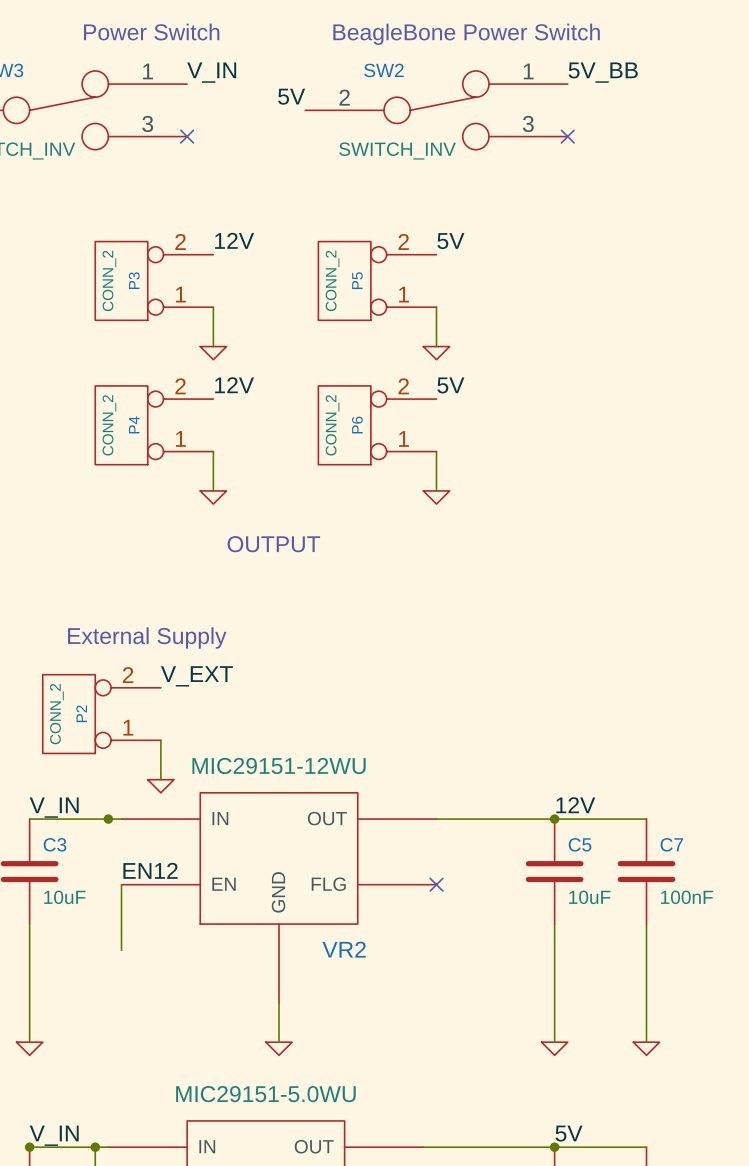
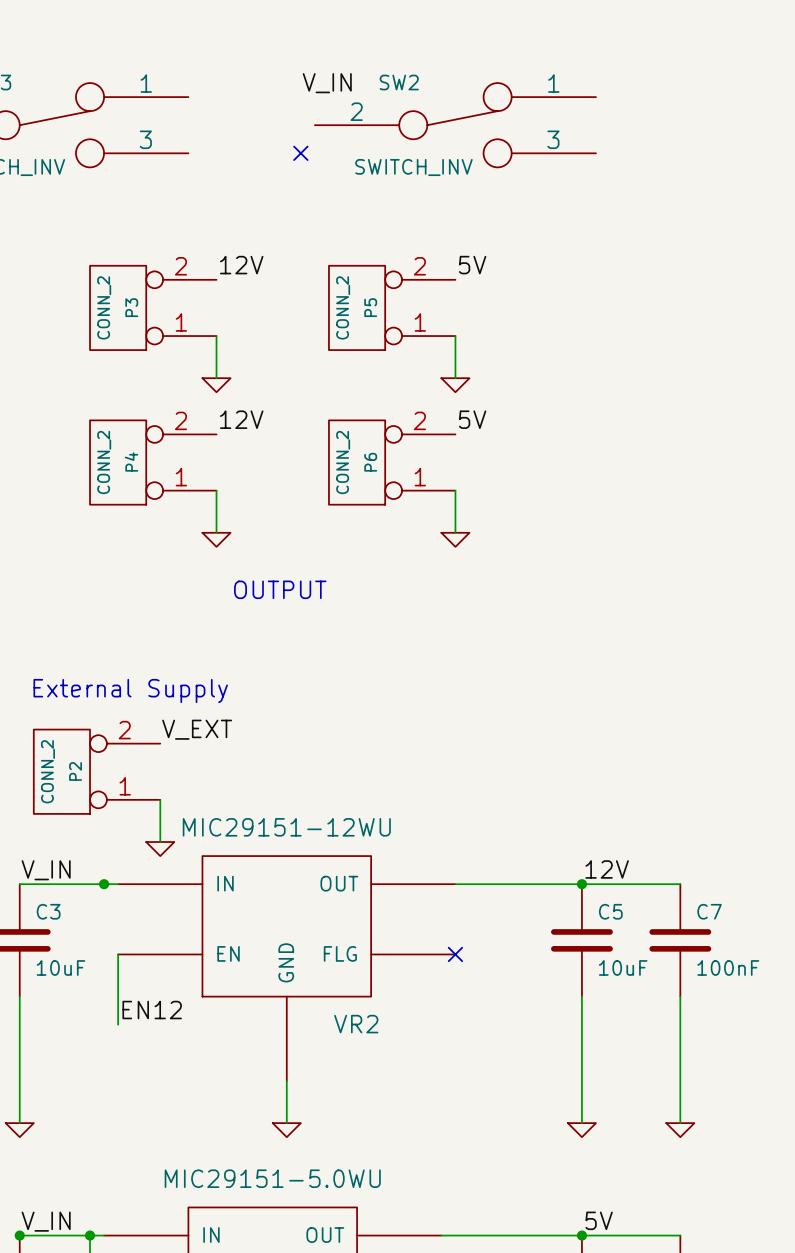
text: Power Switch (151, 32) -> none
text: BeagleBone Power Switch (466, 34) -> none
label position: V_IN (211, 72) -> V_IN (327, 83)
label: 5V_BB (603, 72) -> none
label: 5V (291, 96) -> none
no-connect mark: (187, 136) -> none
no-connect mark: none -> (300, 153)
no-connect mark: (567, 136) -> none
label position: EN12 (150, 870) -> EN12 (152, 1010)

